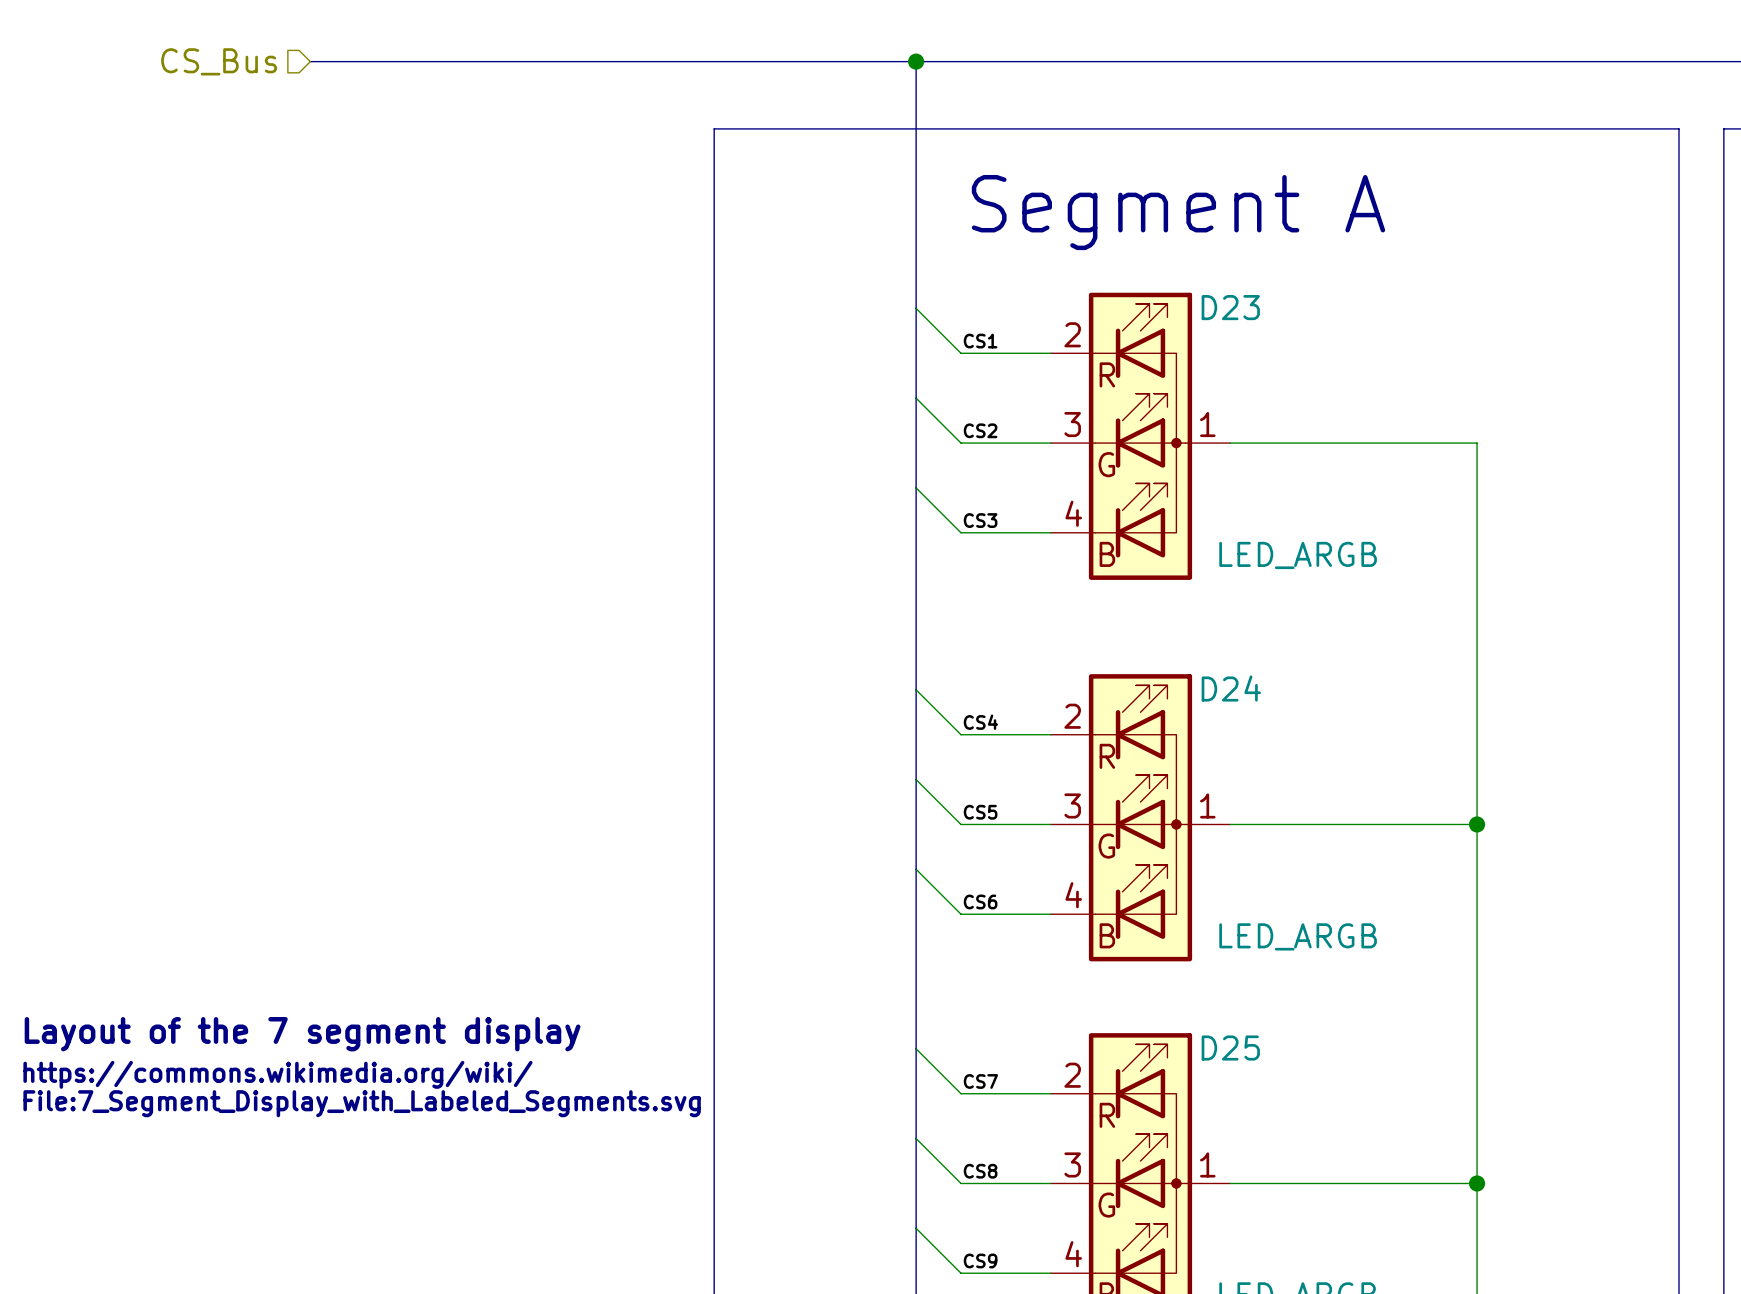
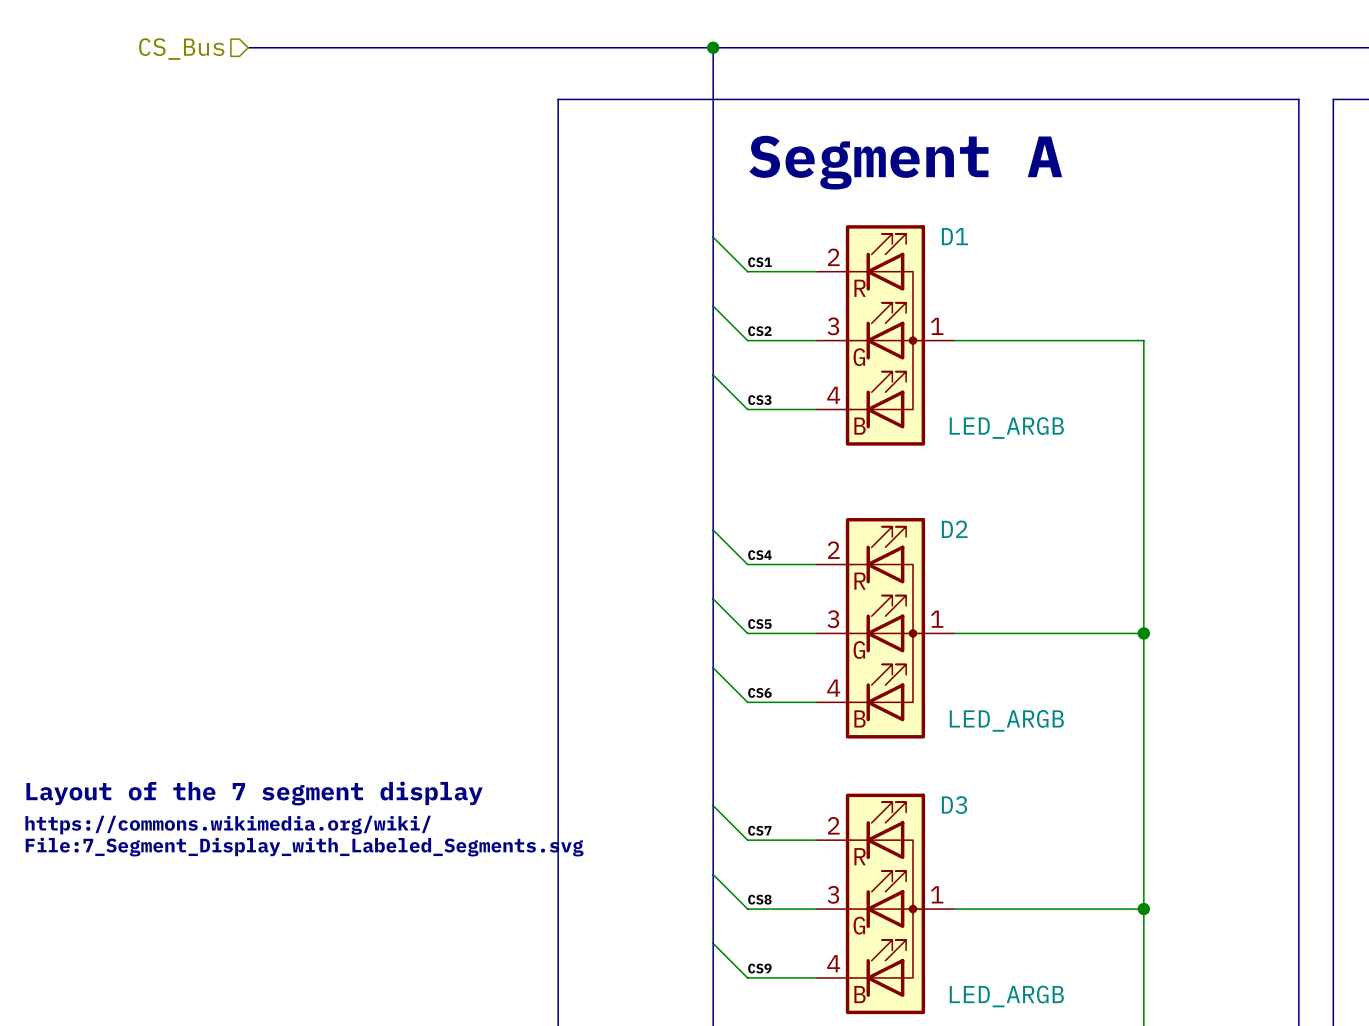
D23 name: D23 (1230, 307) -> D1 (954, 236)
D24 name: D24 (1231, 688) -> D2 (954, 529)
D25 name: D25 (1230, 1048) -> D3 (954, 805)

